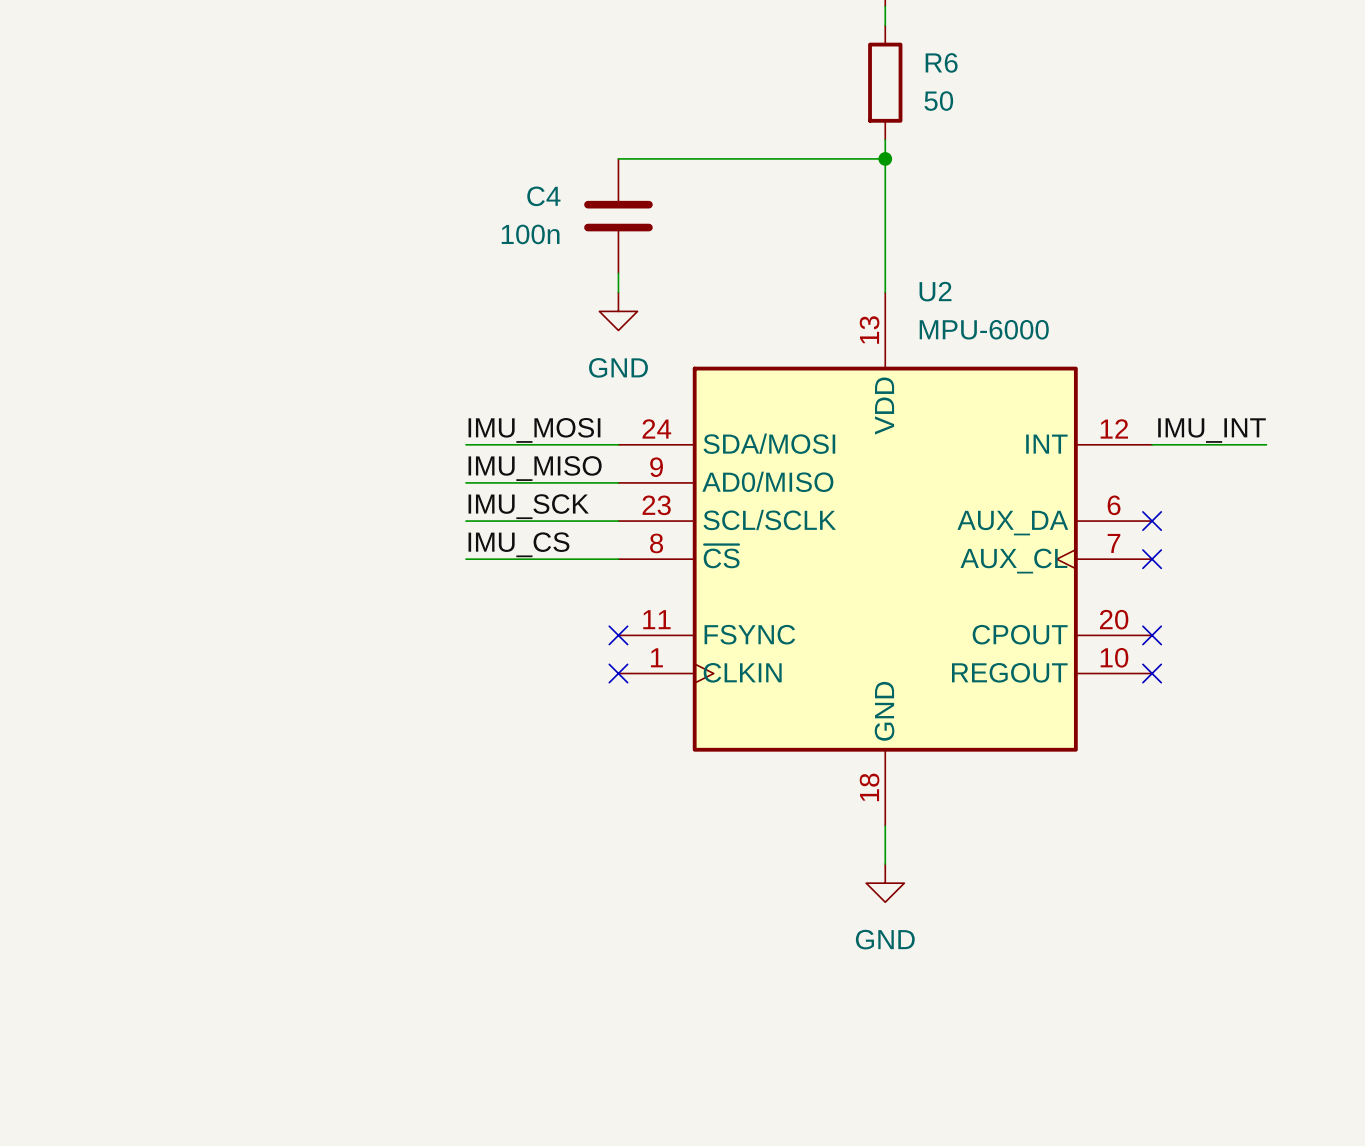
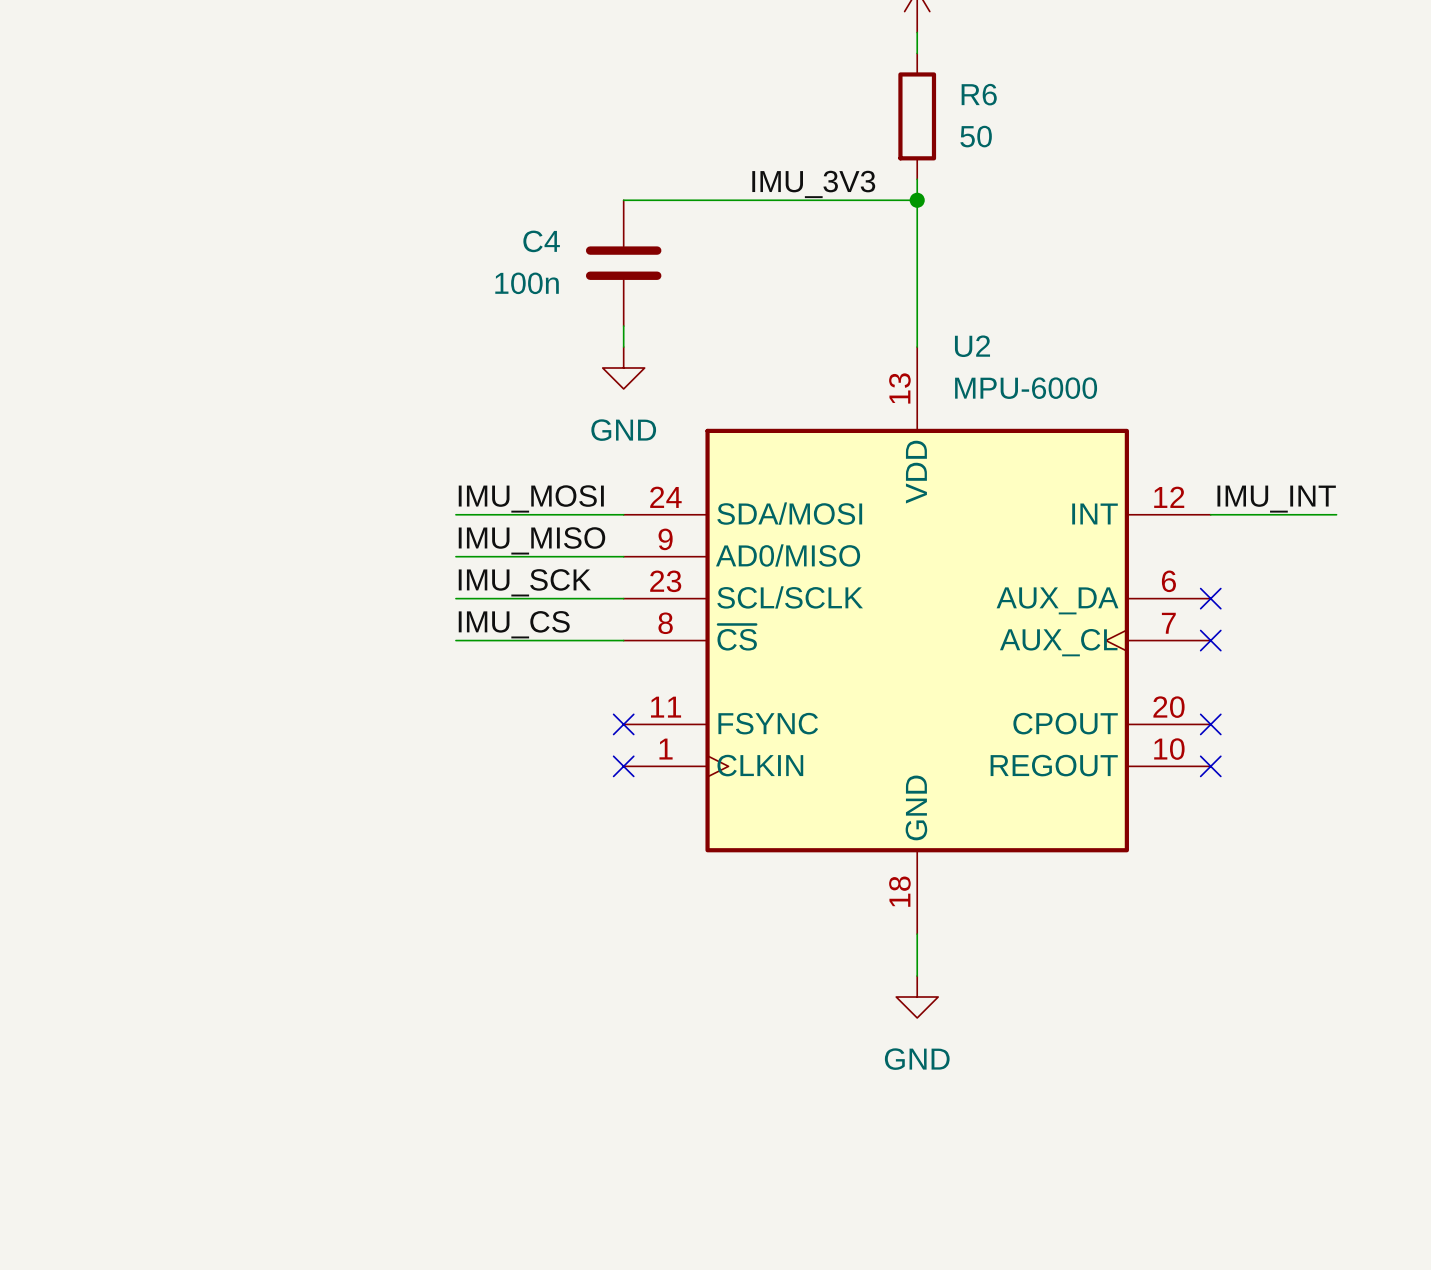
label: none -> IMU_3V3 (813, 184)

